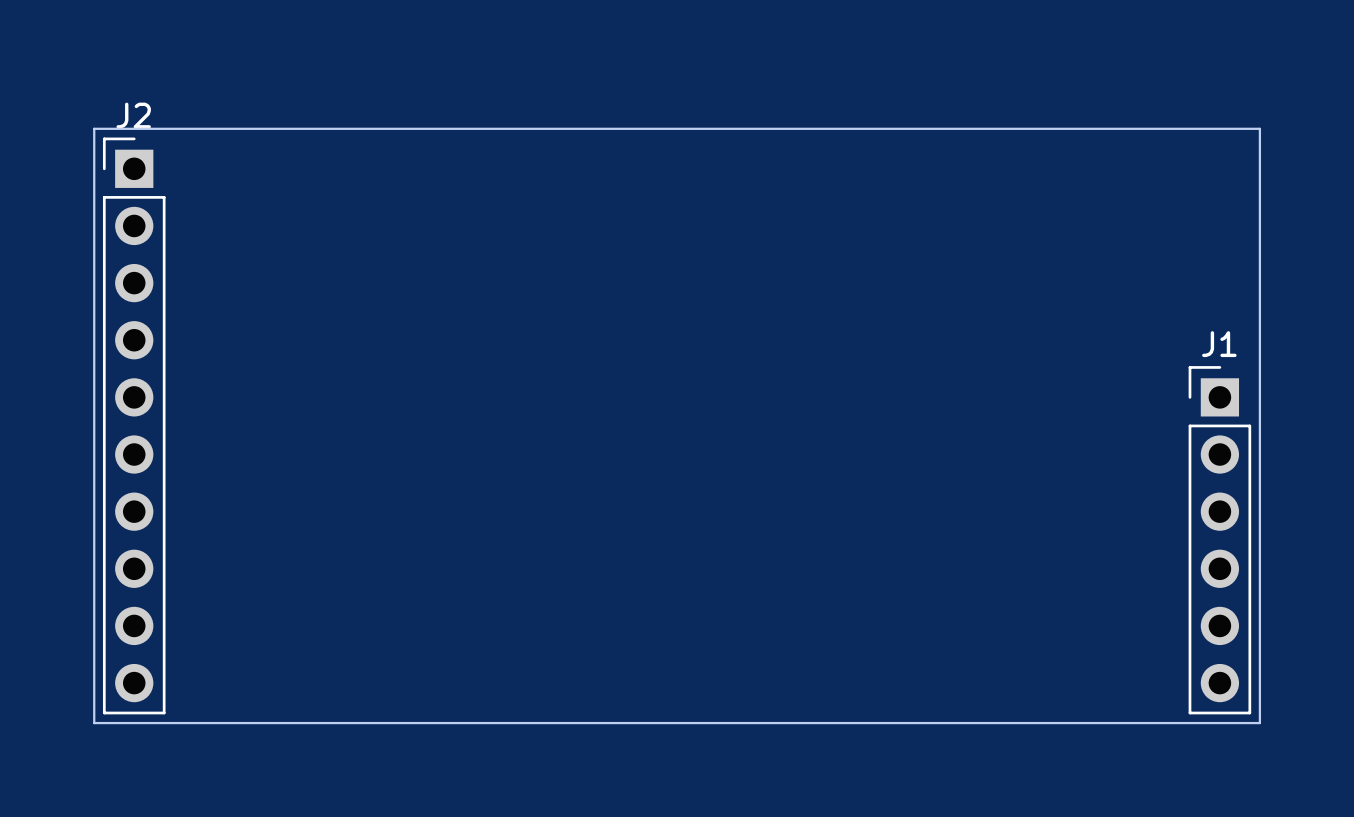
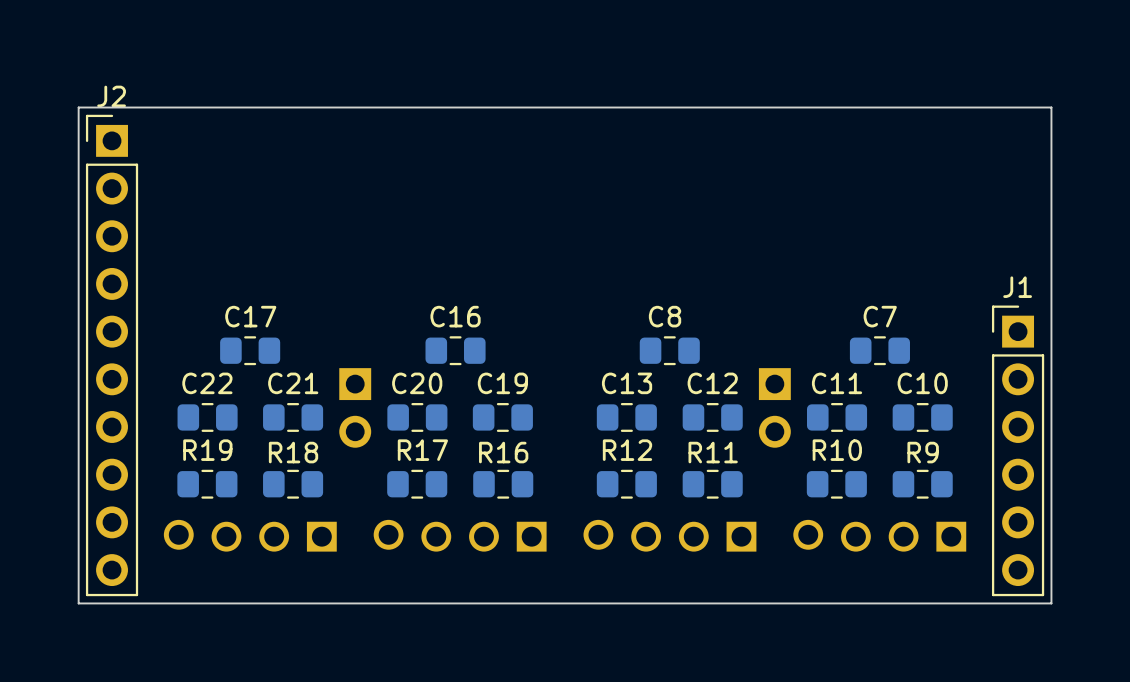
C17: none -> (250, 350)
C16: none -> (455, 350)
C8: none -> (669, 350)
C7: none -> (879, 350)
part: none -> (355, 407)
part: none -> (774, 407)
C22: none -> (207, 417)
C21: none -> (293, 417)
C20: none -> (417, 417)
C19: none -> (502, 417)
C13: none -> (626, 417)
C12: none -> (712, 417)
C11: none -> (837, 417)
C10: none -> (922, 417)
R19: none -> (207, 484)
R18: none -> (293, 484)
R17: none -> (417, 484)
R16: none -> (503, 484)
R12: none -> (626, 484)
R11: none -> (712, 484)
R10: none -> (836, 484)
R9: none -> (922, 484)
part: none -> (250, 535)
part: none -> (460, 535)
part: none -> (669, 535)
part: none -> (879, 535)

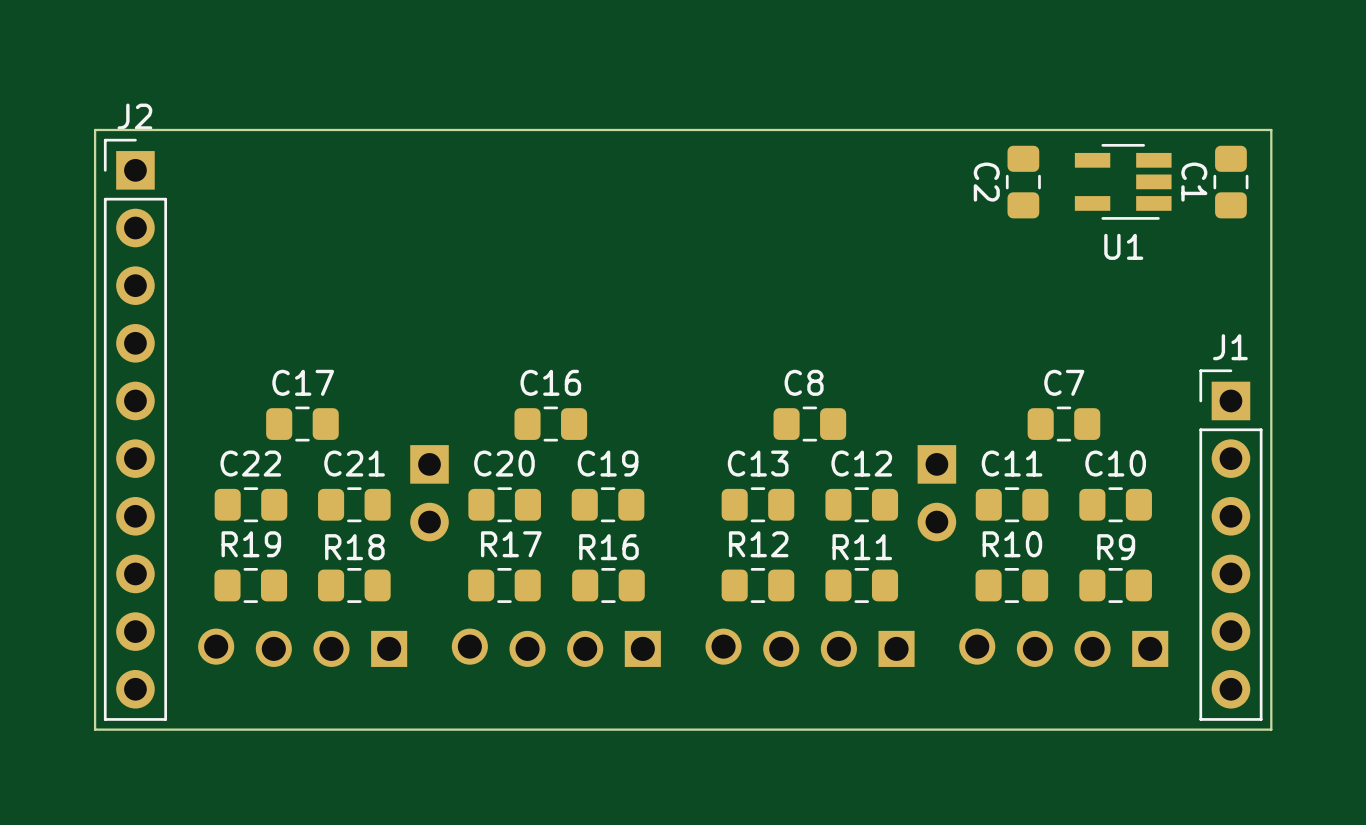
C2: none -> (1023, 182)
U1: none -> (1123, 181)
C1: none -> (1230, 182)

